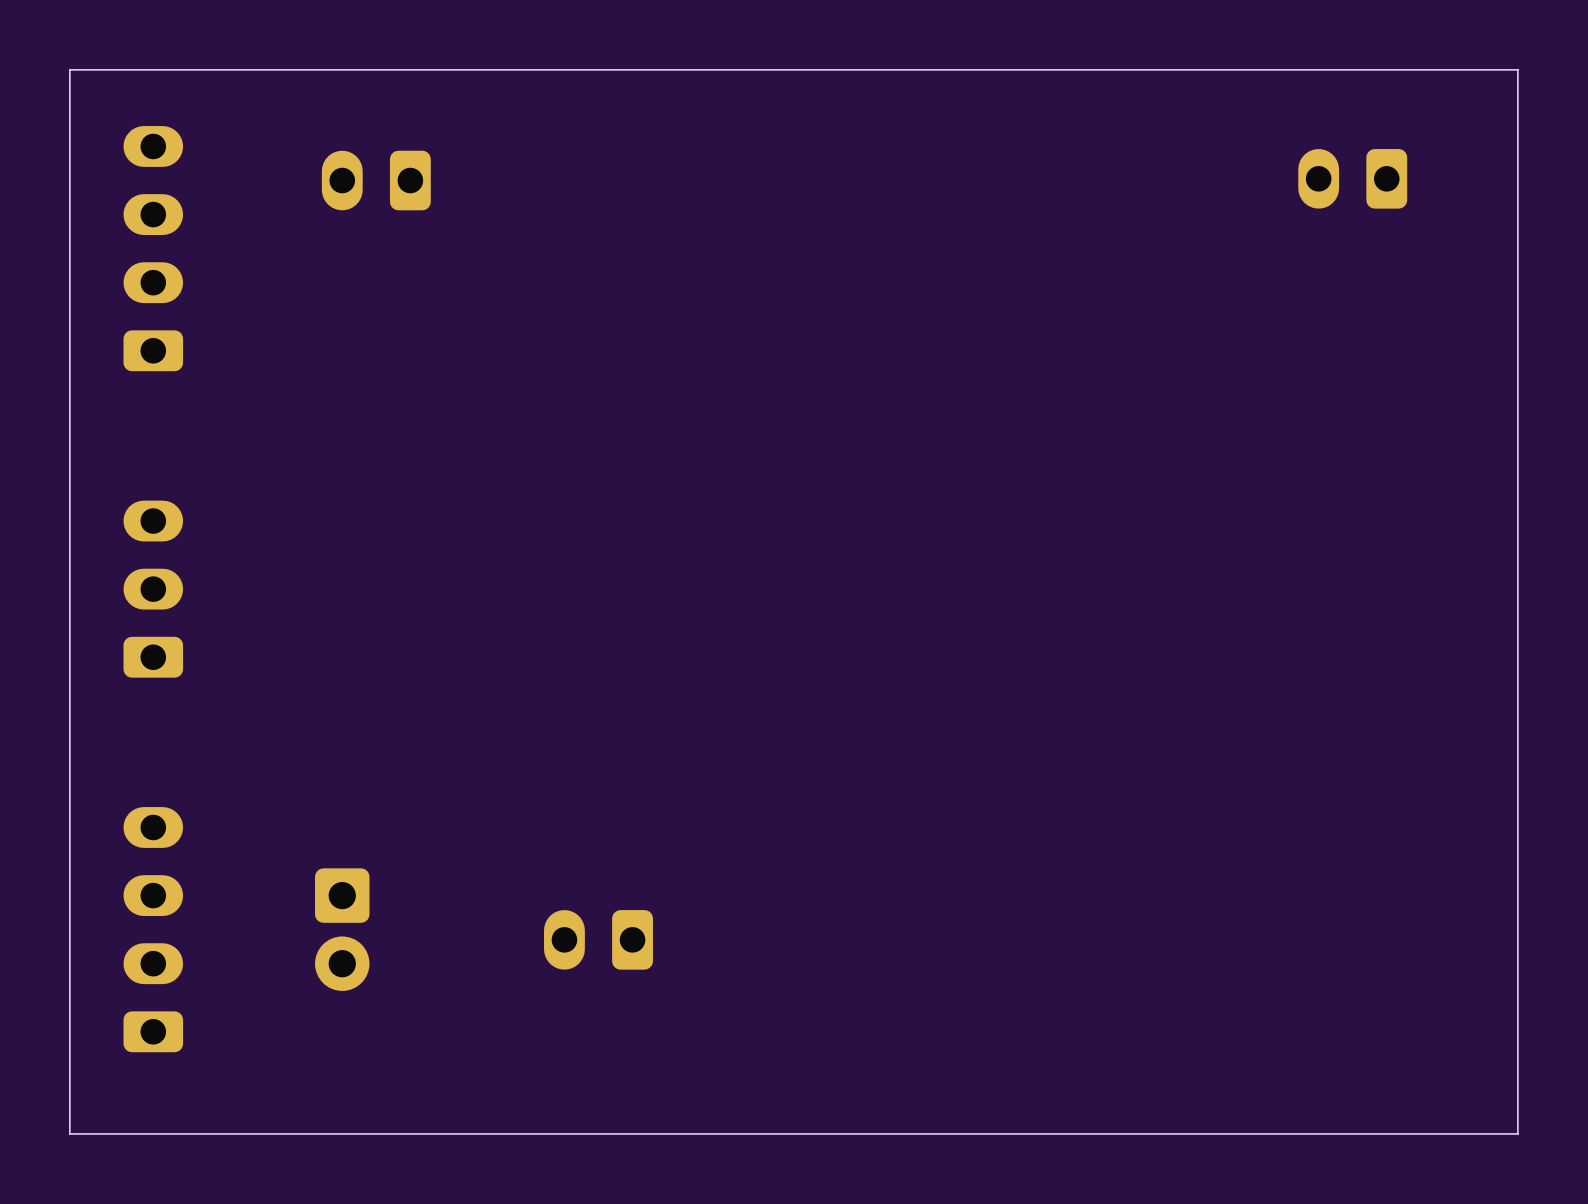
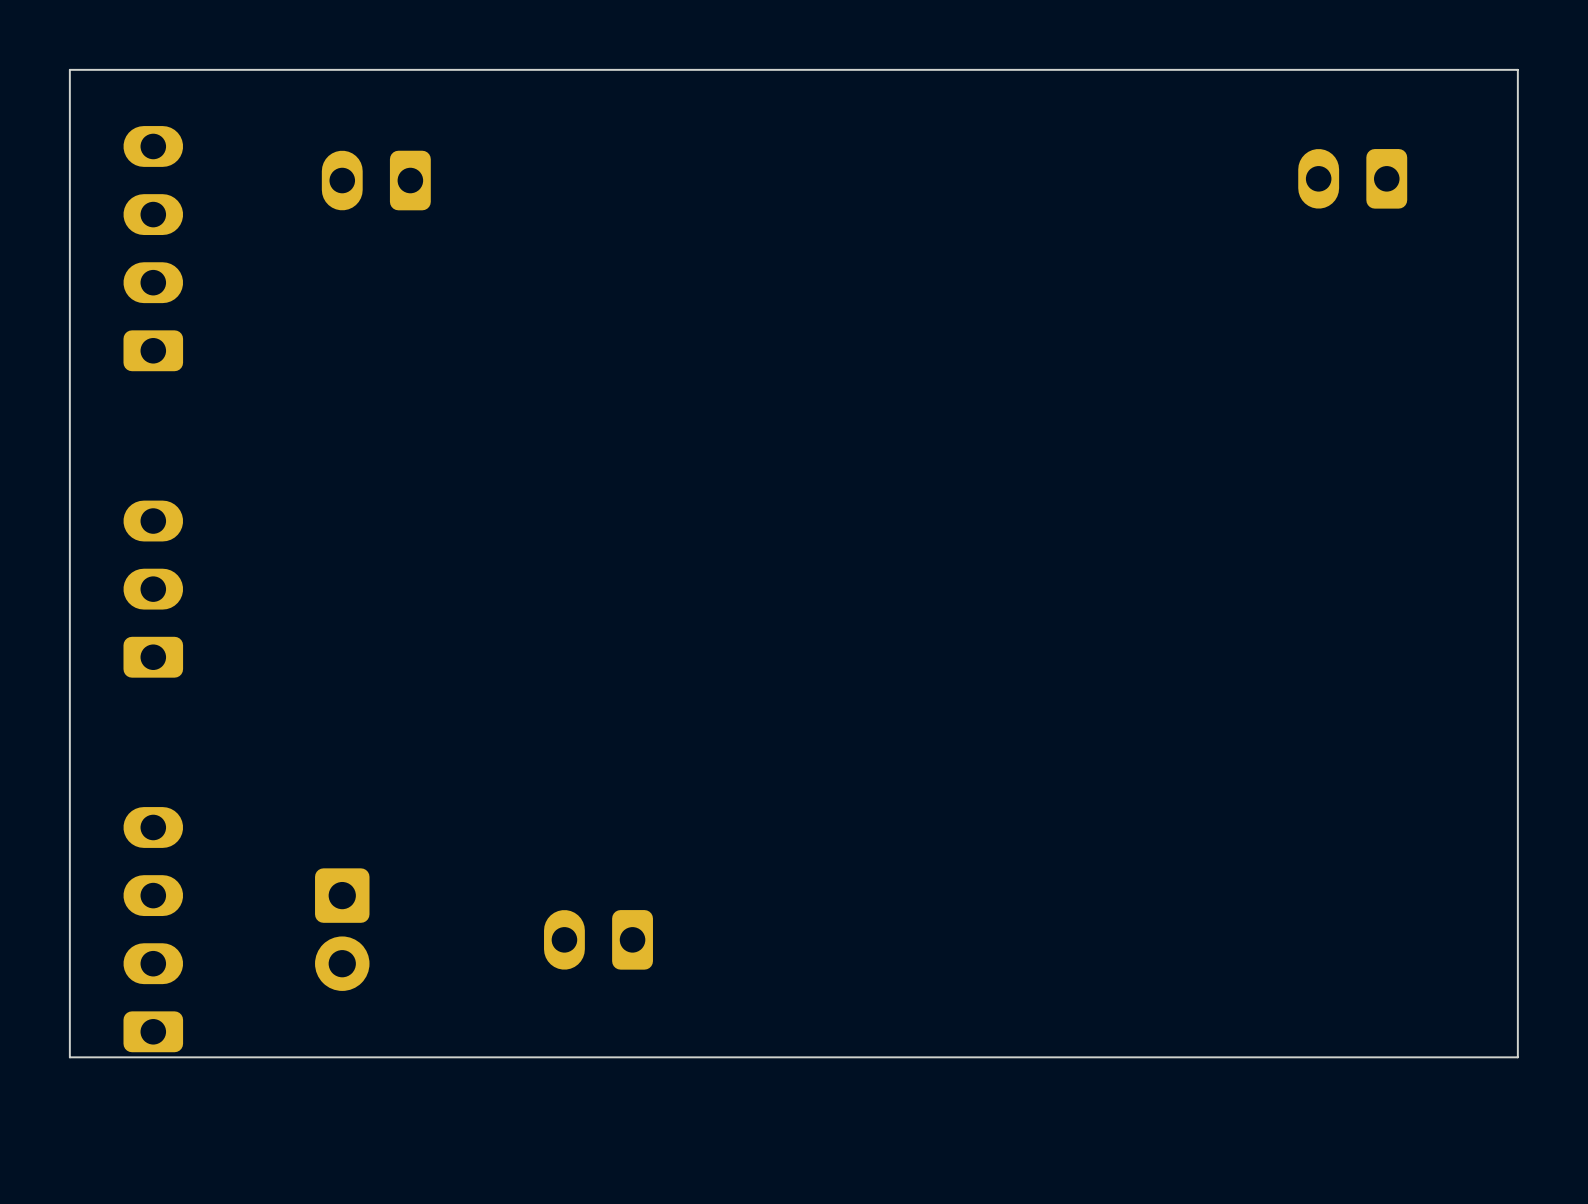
board edge: (1517, 1057) (1517, 1133) (69, 1133) (69, 1057) -> (1517, 1057) (69, 1057)

